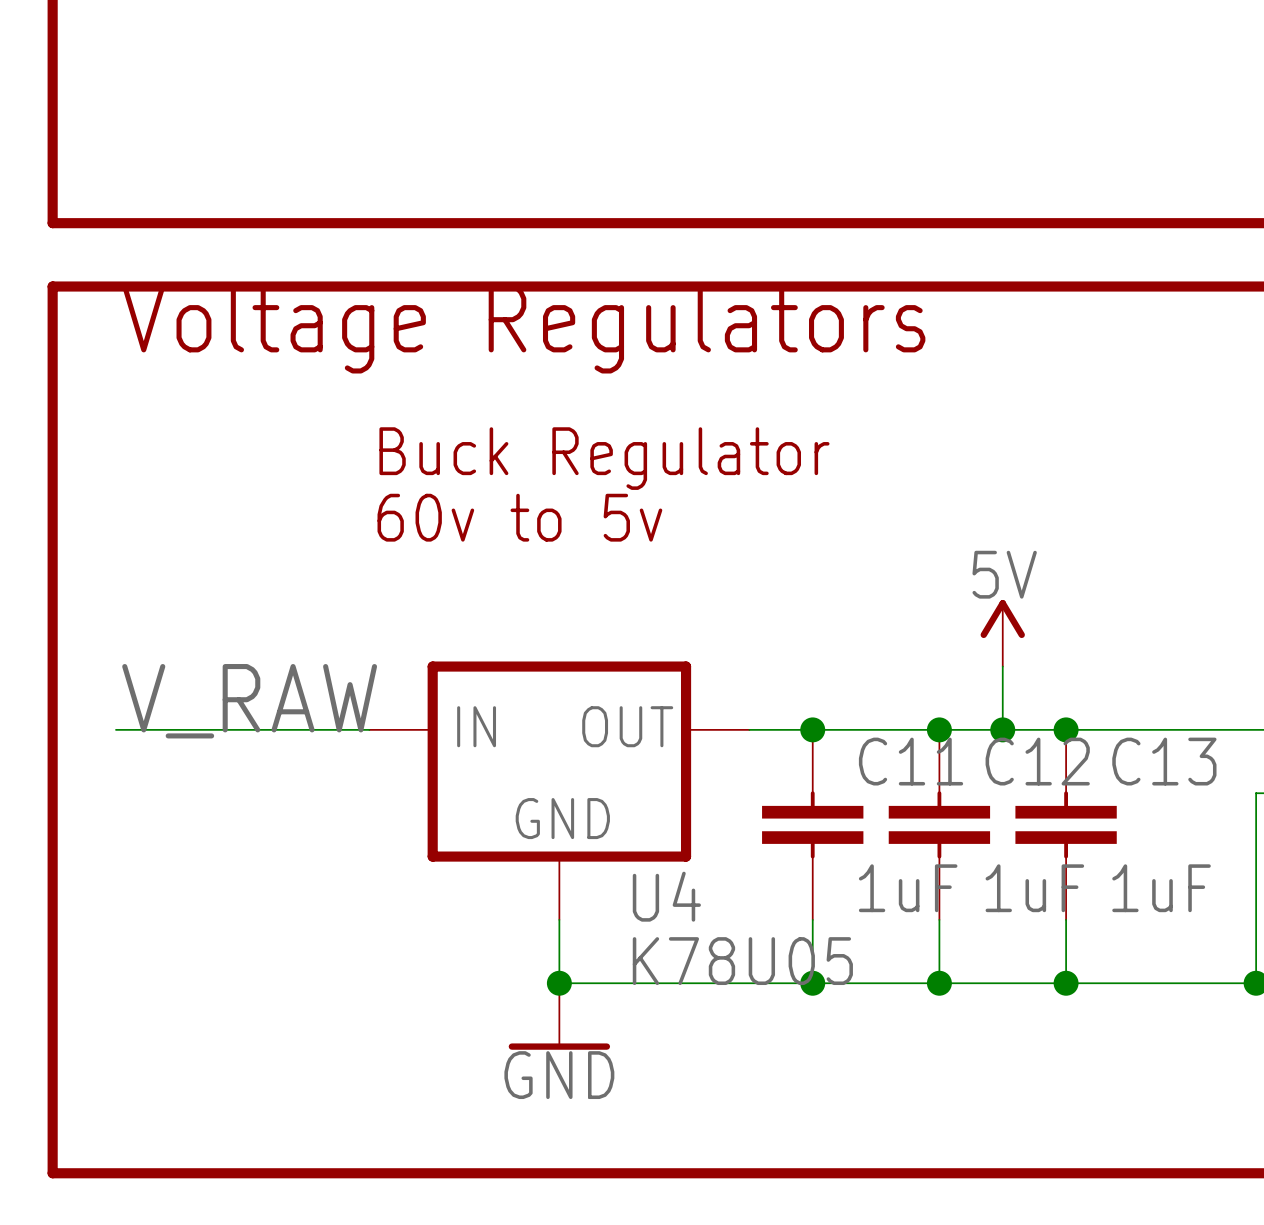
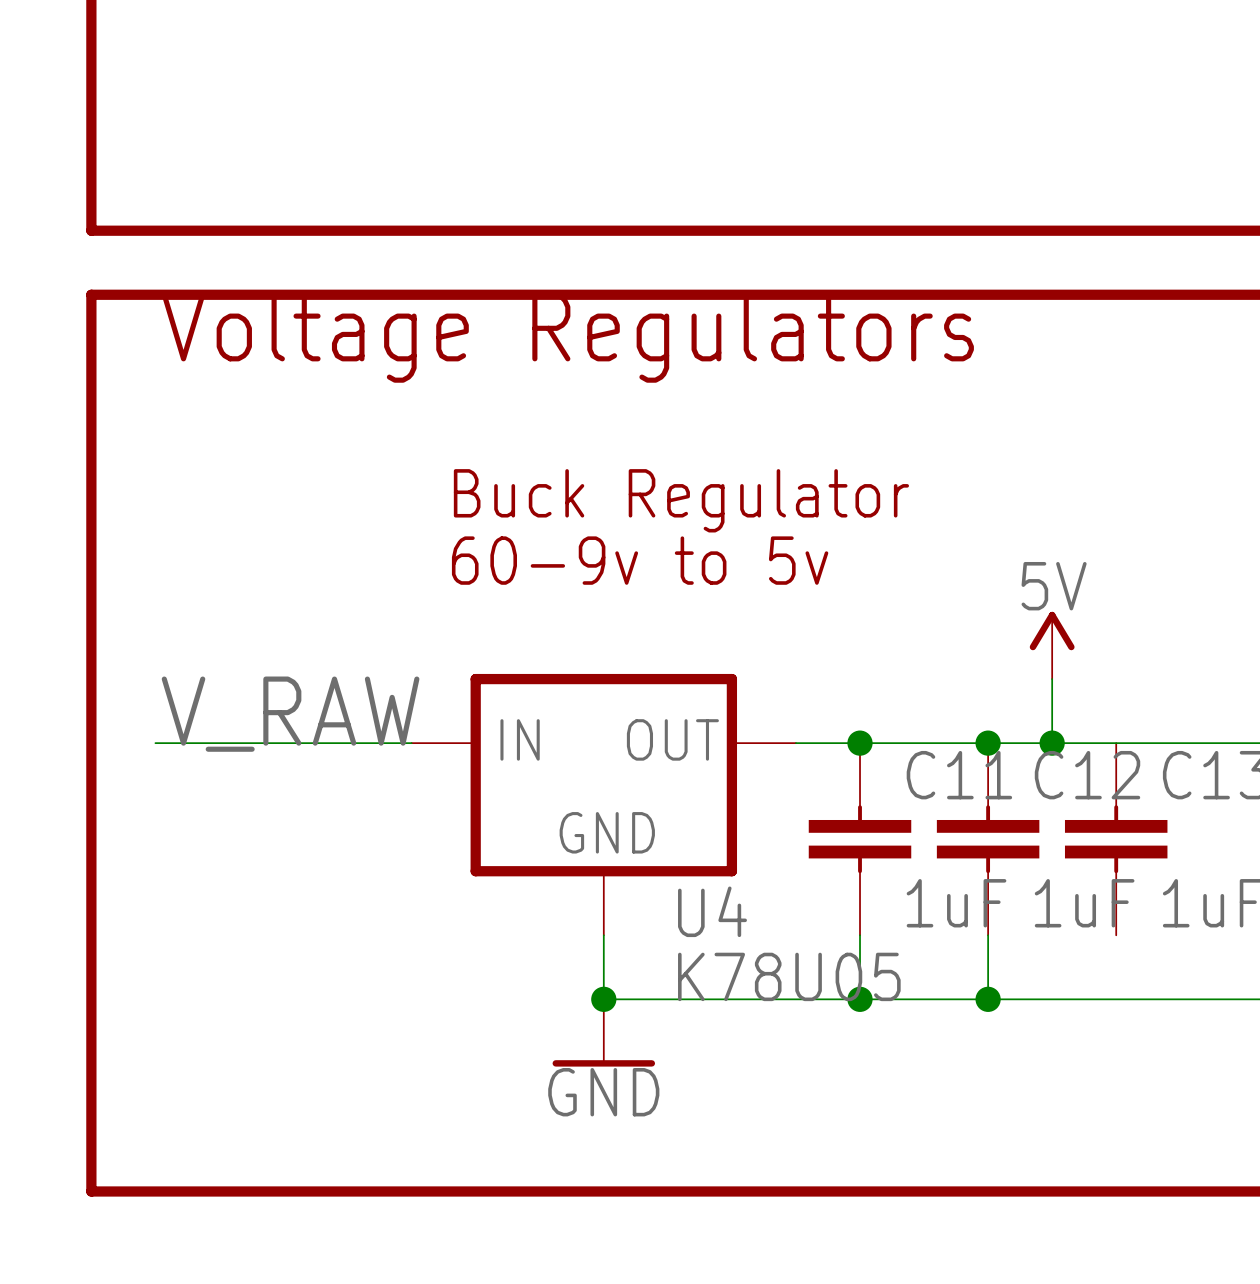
text position: Buck Regulator (604, 458) -> Buck Regulator (681, 500)
text: 60v to 5v (519, 517) -> 60-9v to 5v (640, 560)
junction: (1066, 729) -> none
wire: (1066, 919) (1066, 983) -> none
junction: (1066, 983) -> none

